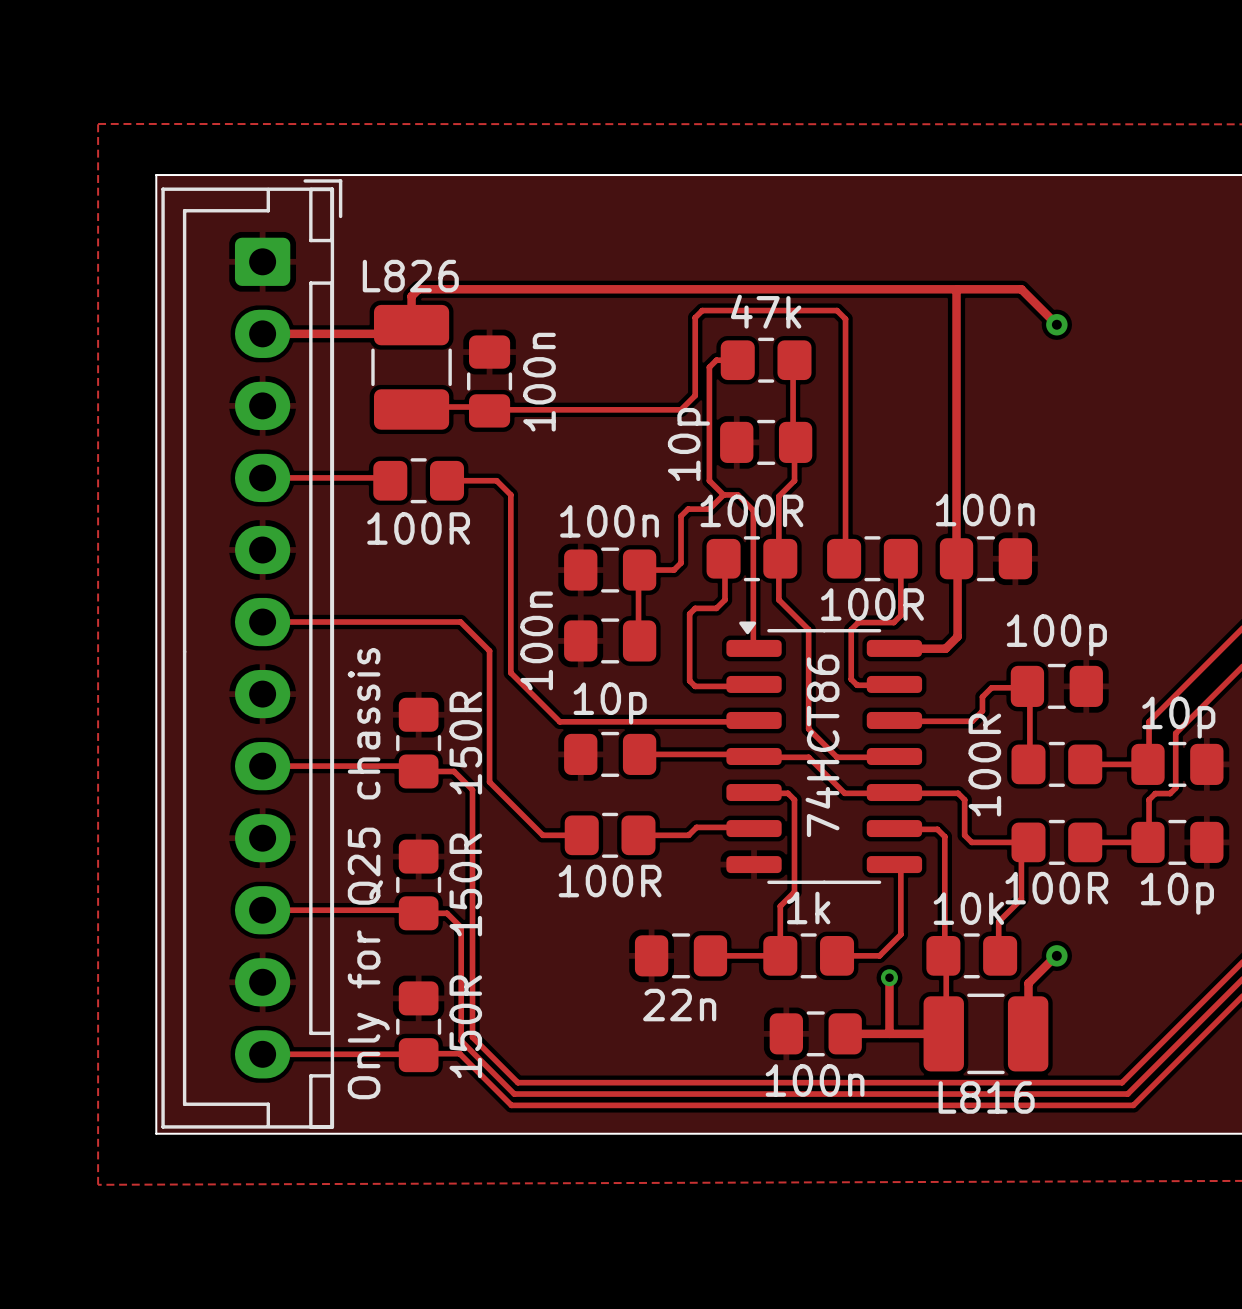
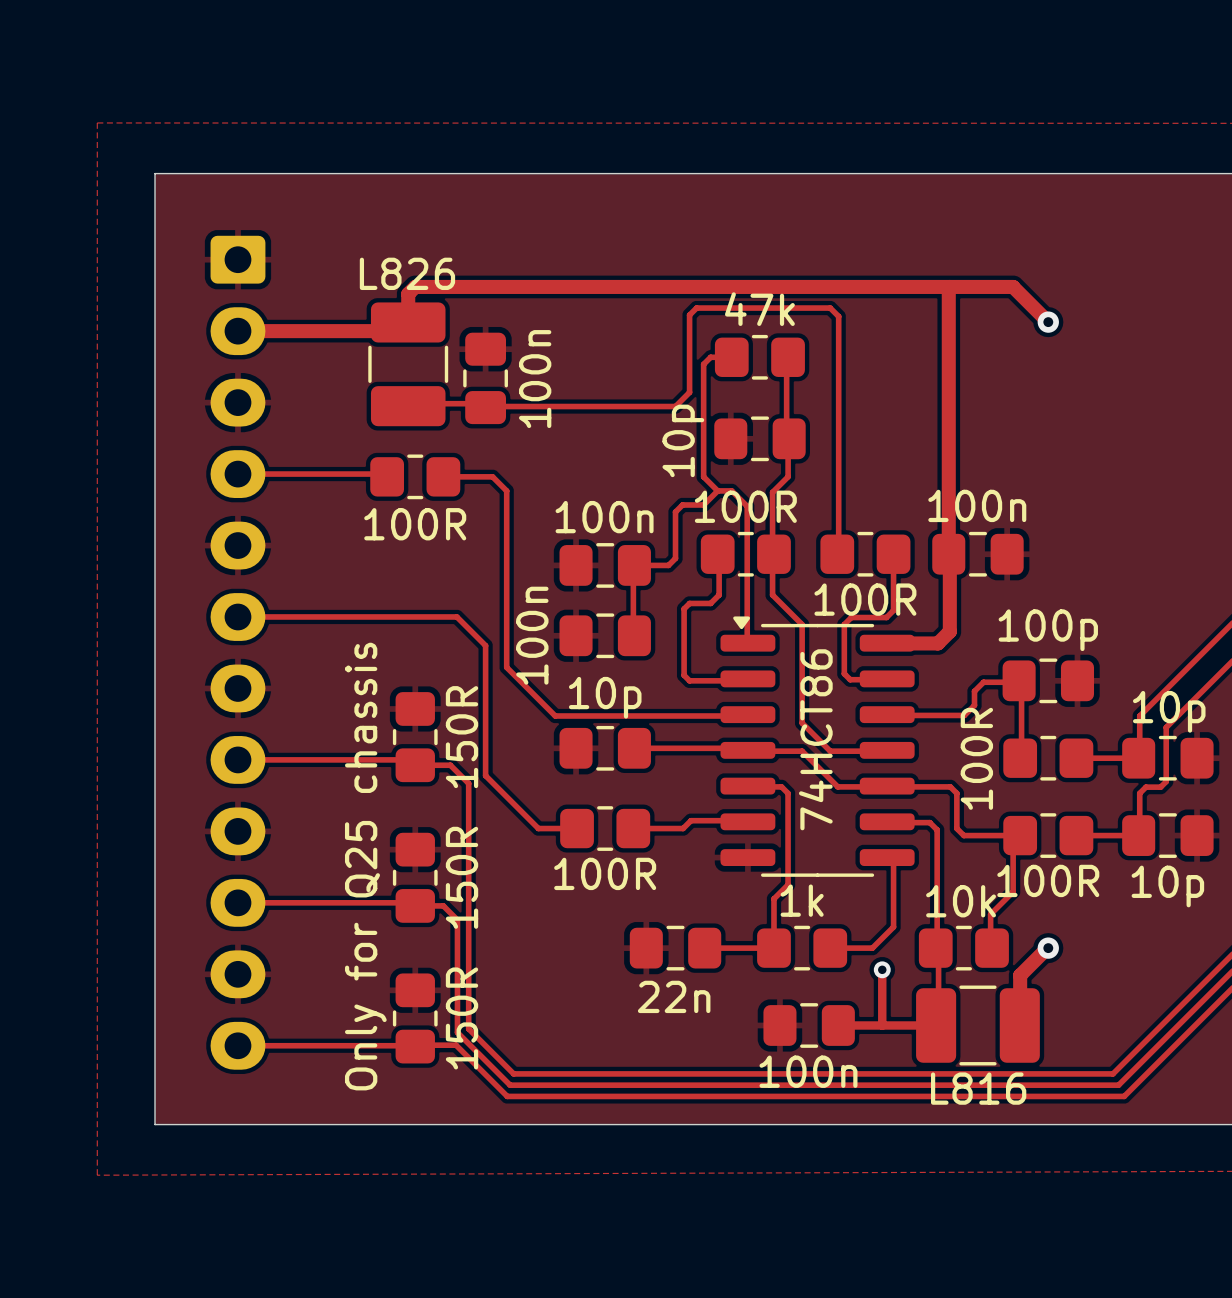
track width: thin (956, 290) (956, 558) -> thick (948, 287) (948, 554)
track width: thin (1056, 324) (1021, 289) (418, 289) (411, 296) (411, 327) -> thick (1048, 322) (1013, 286) (415, 286) (408, 293) (408, 324)
track width: thin (262, 333) (405, 333) -> thick (260, 331) (402, 331)
track width: thin (957, 558) (957, 636) (945, 648) (900, 648) -> thick (949, 554) (949, 631) (937, 643) (893, 643)
part side: top (251, 653) -> bottom (237, 652)
track width: thin (1056, 955) (1028, 983) (1028, 1031) -> thick (1047, 948) (1020, 975) (1020, 1022)

